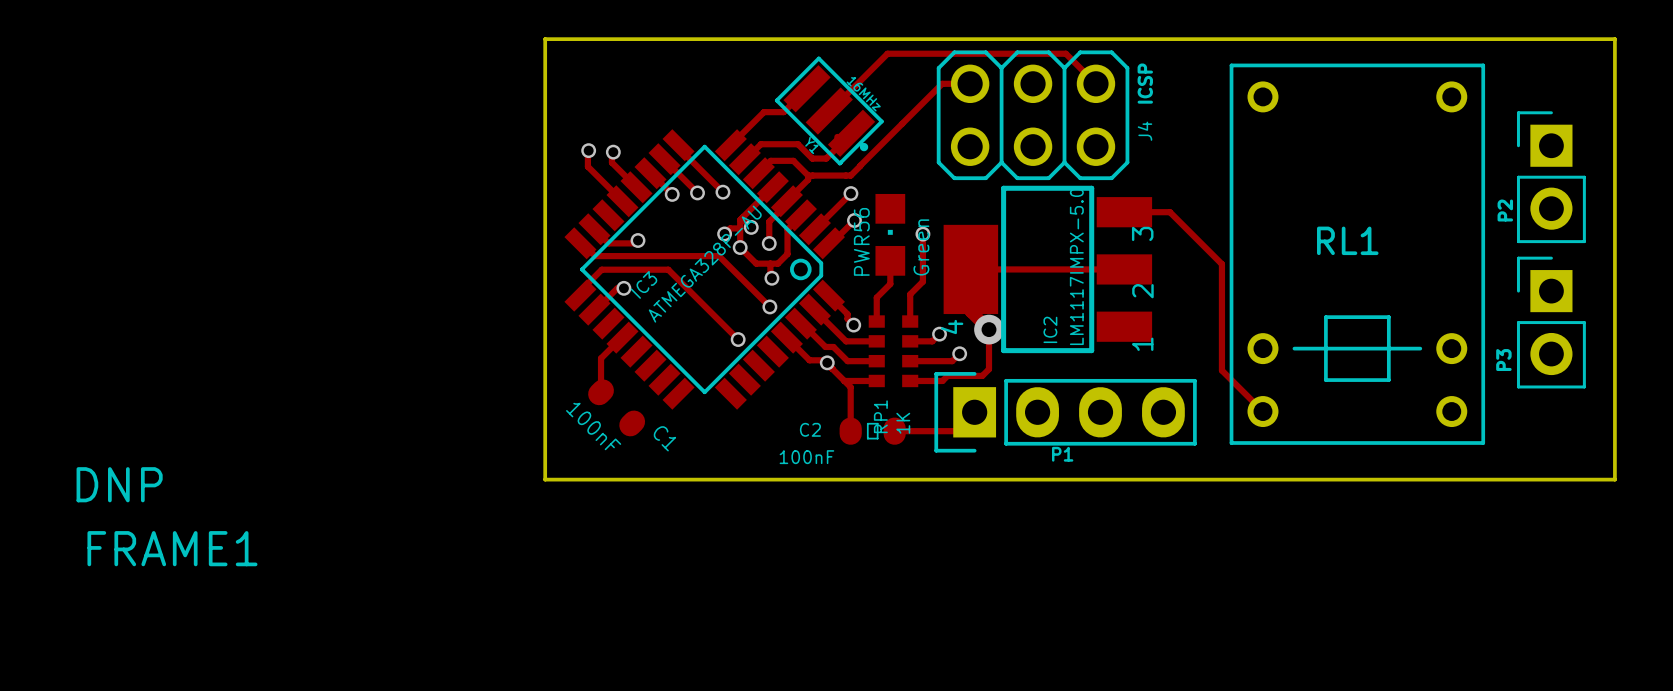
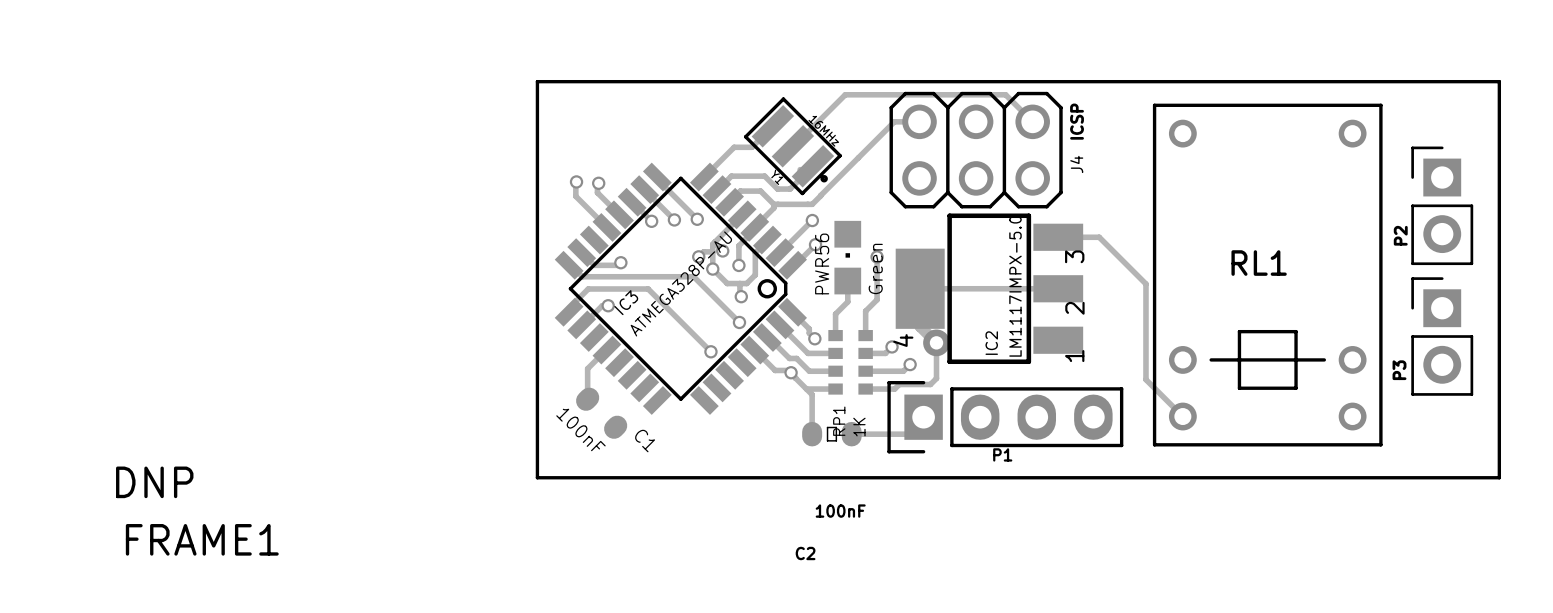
C2 name position: C2 (810, 429) -> C2 (805, 553)
C2 value position: 100nF (806, 457) -> 100nF (840, 511)

